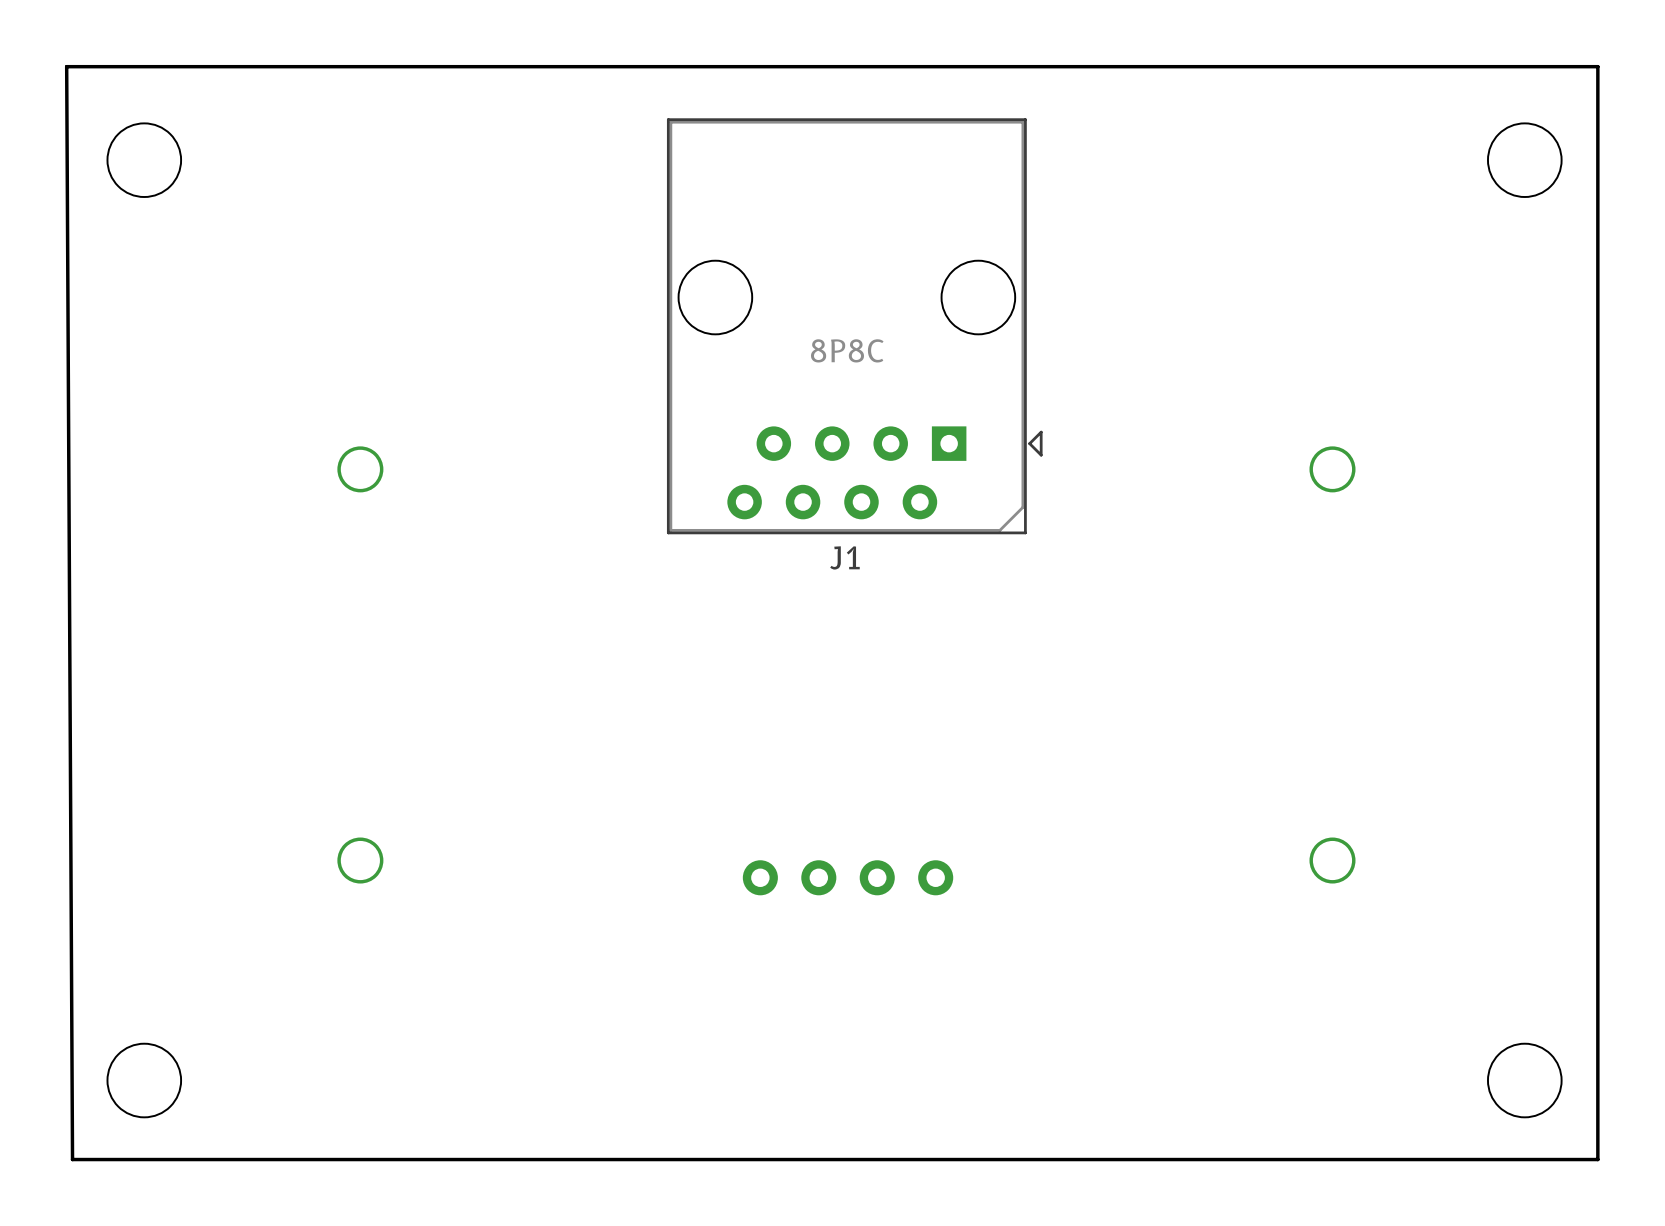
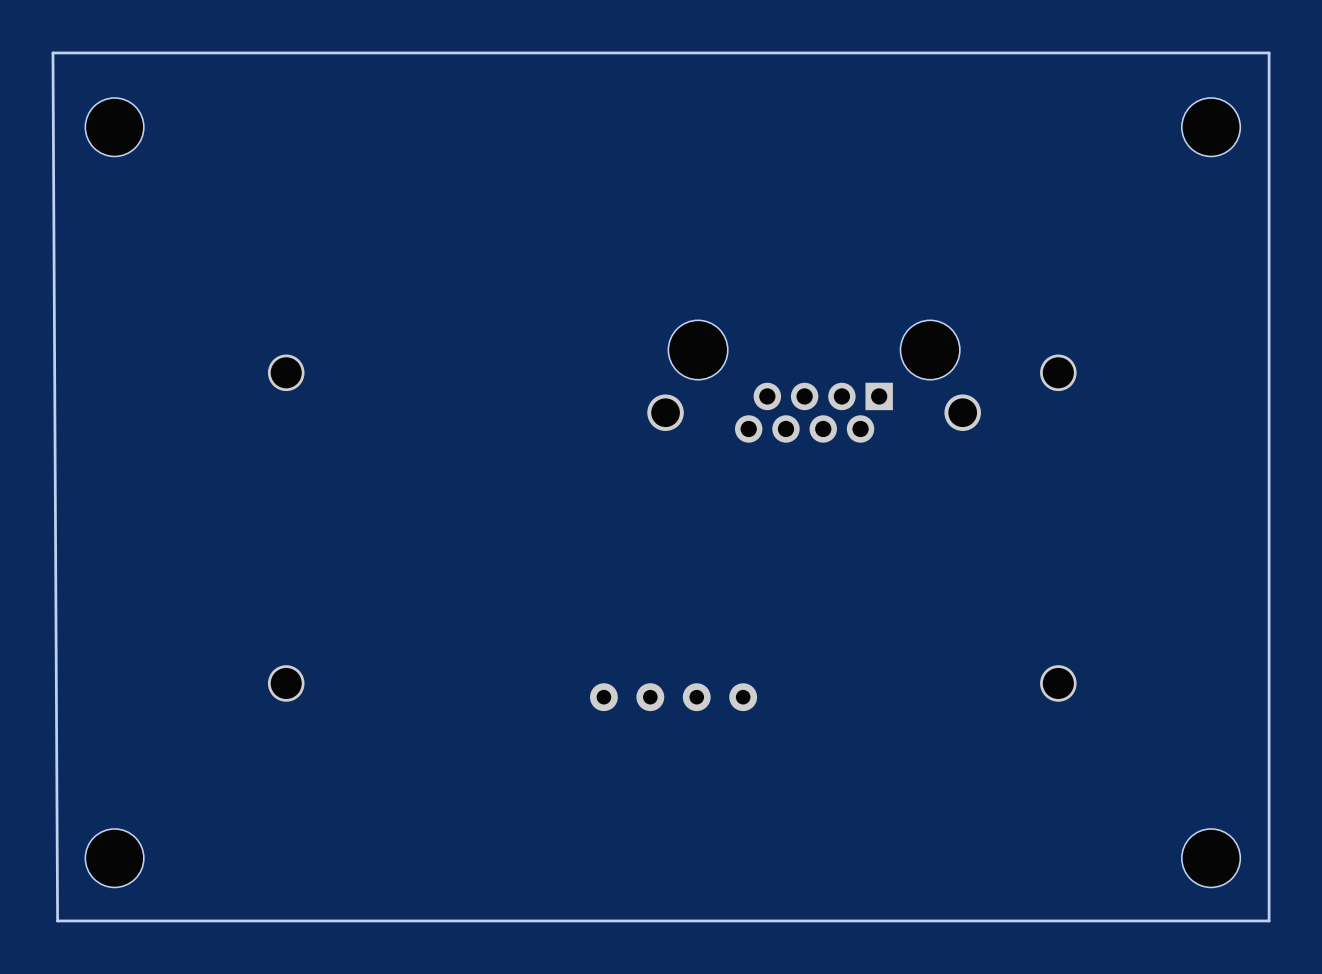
J1: 8P8C (854, 326) -> none
part: none -> (814, 381)

